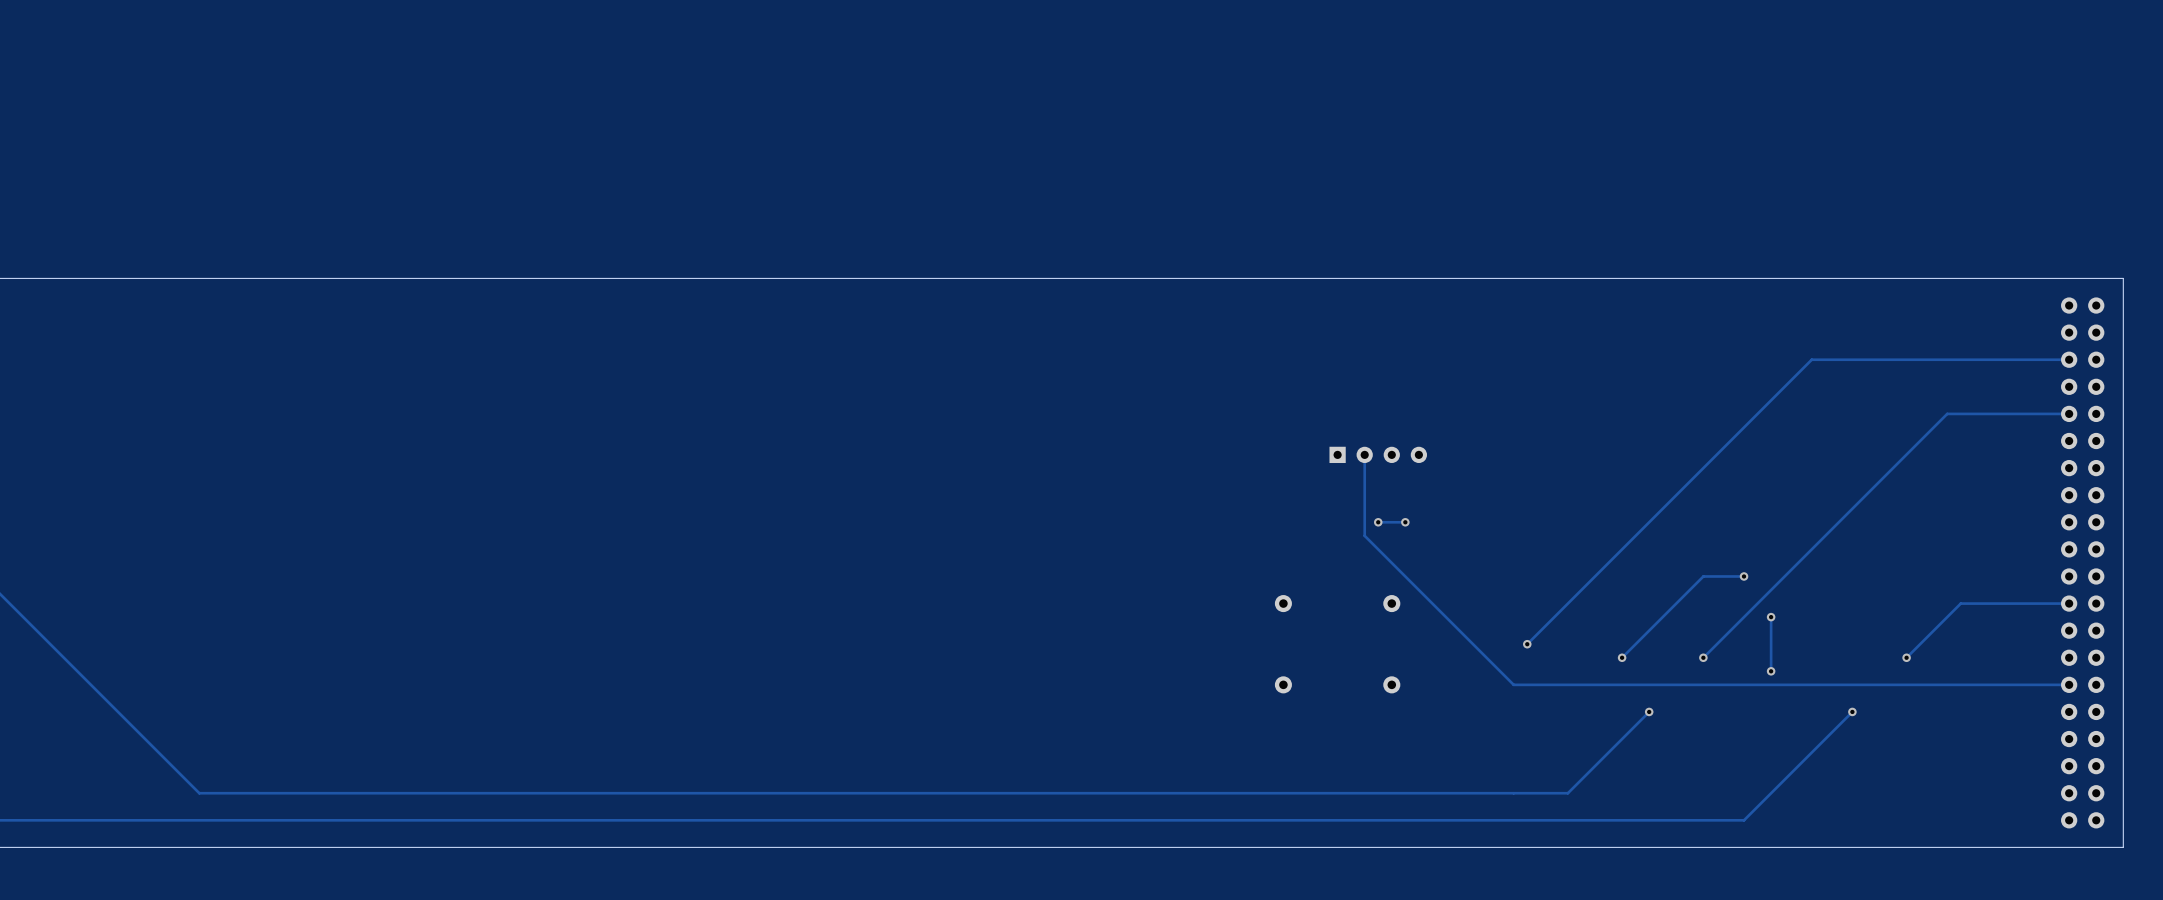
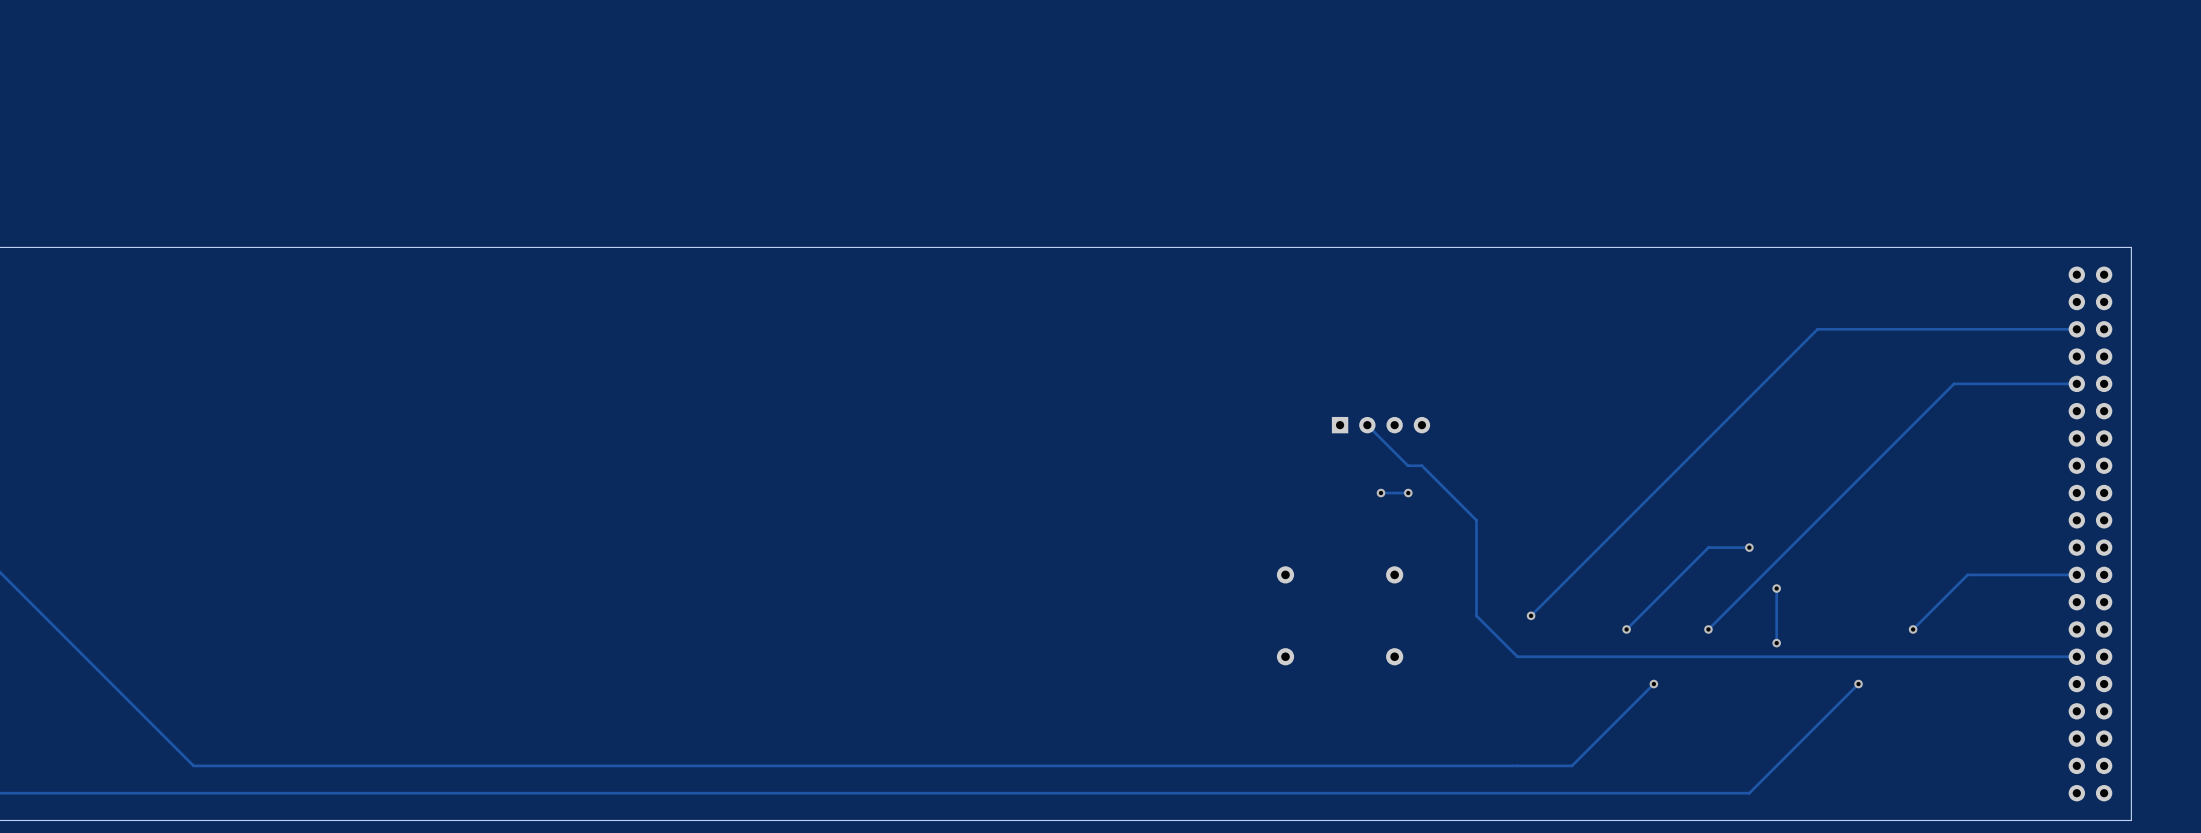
track: (1364, 454) (1364, 535) (1473, 644) -> (1367, 425) (1407, 465) (1421, 465) (1476, 520) (1476, 615)

